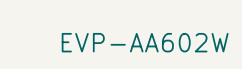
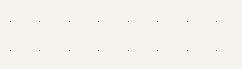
part value: EVP-AA602W (145, 42) -> none

